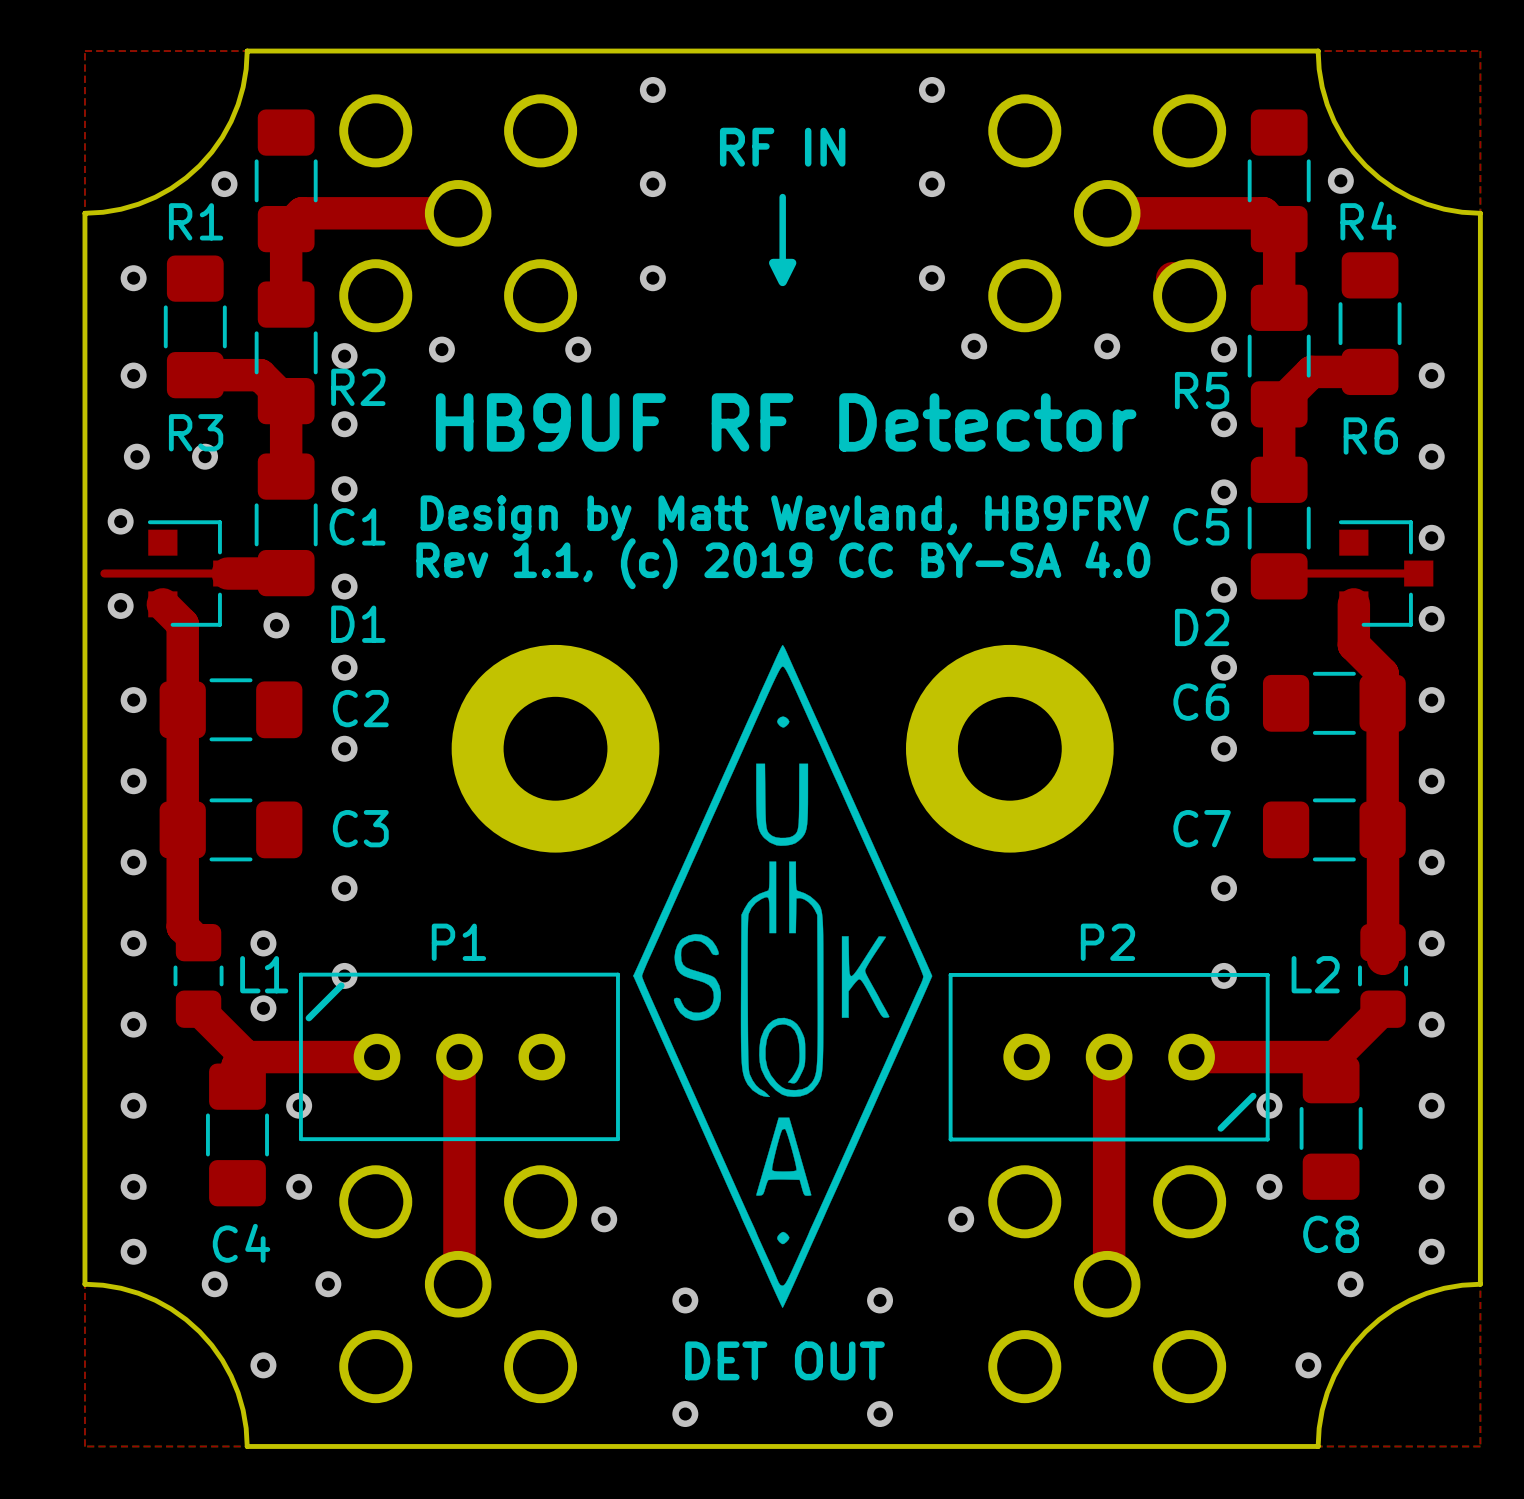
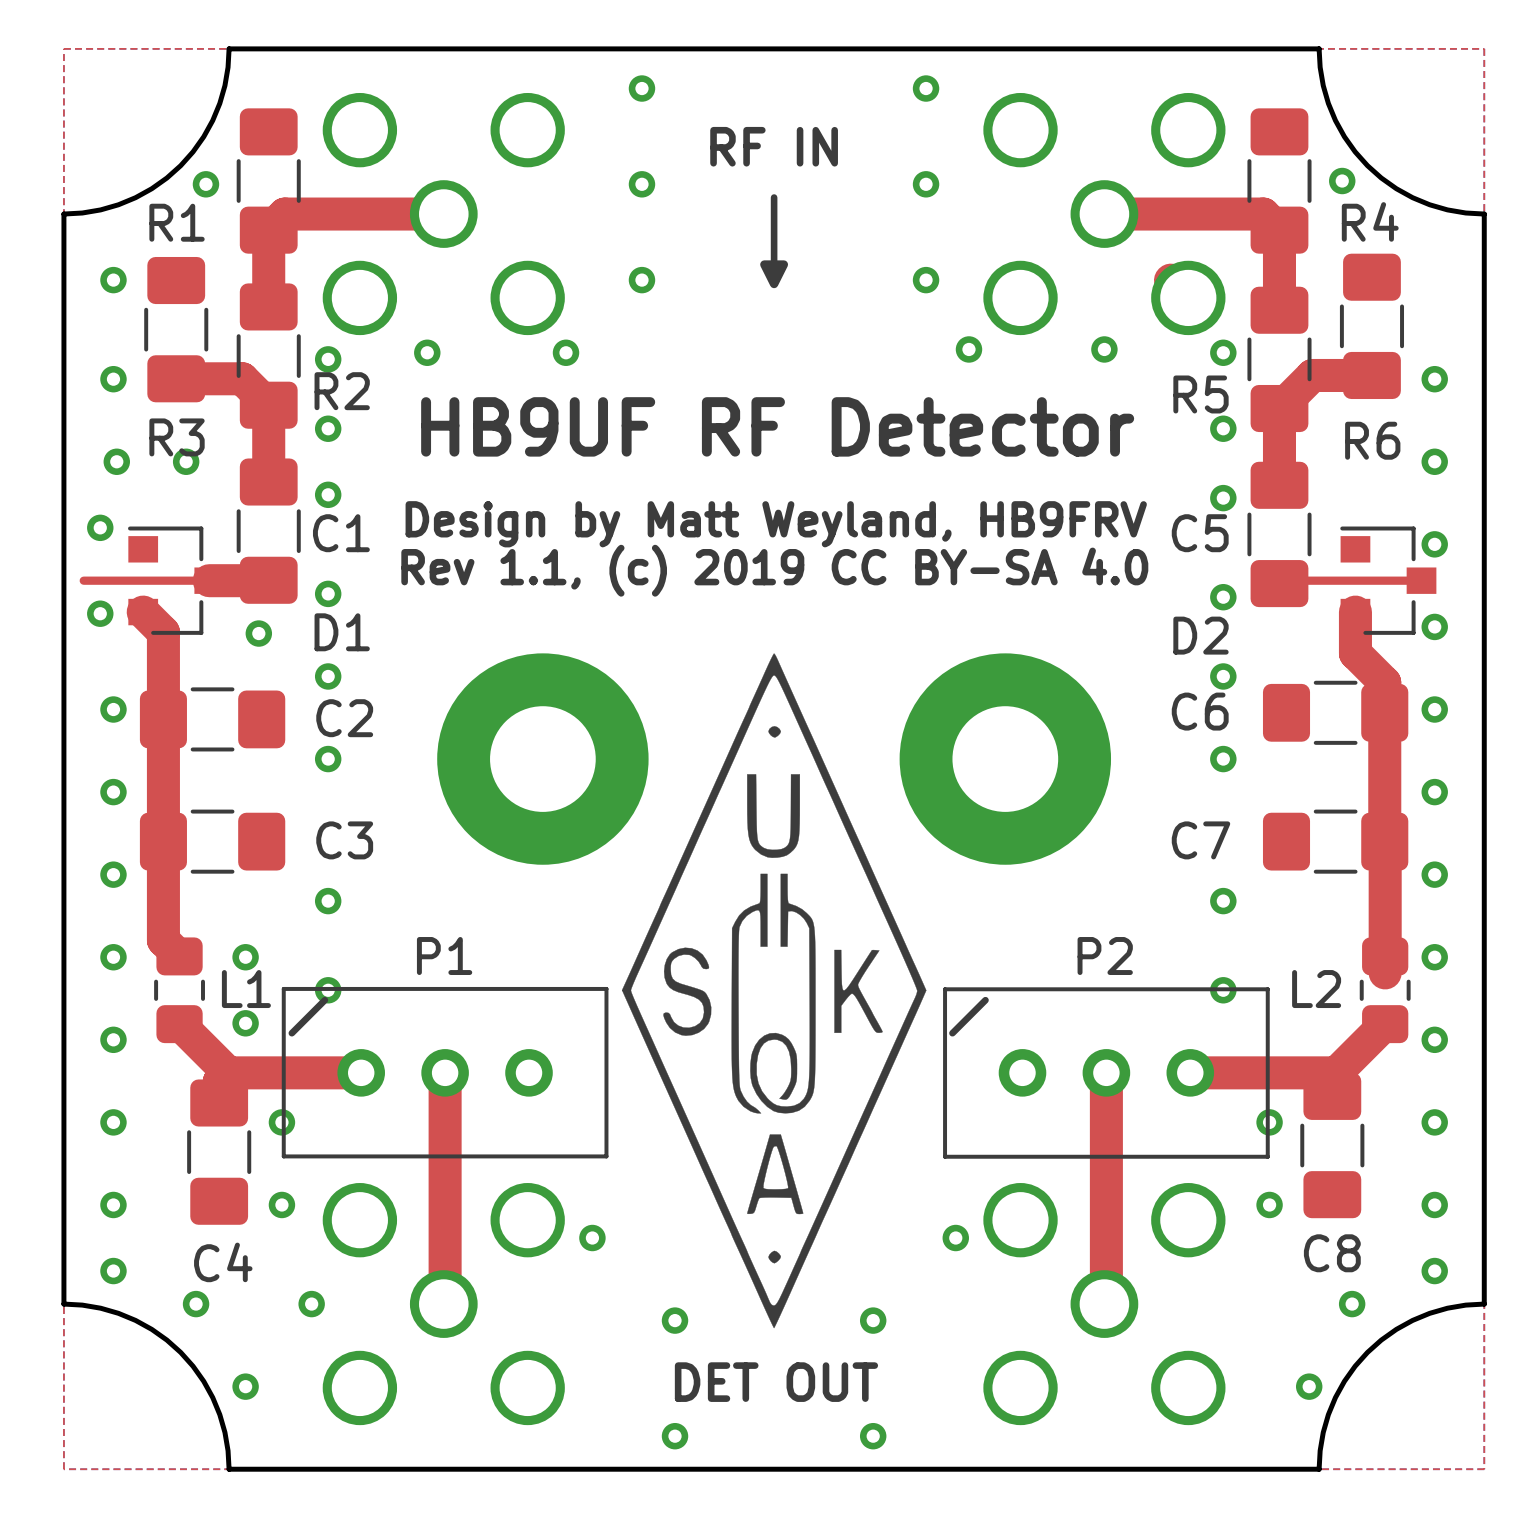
line: (1253, 1096) (1220, 1128) -> (985, 1000) (952, 1033)

